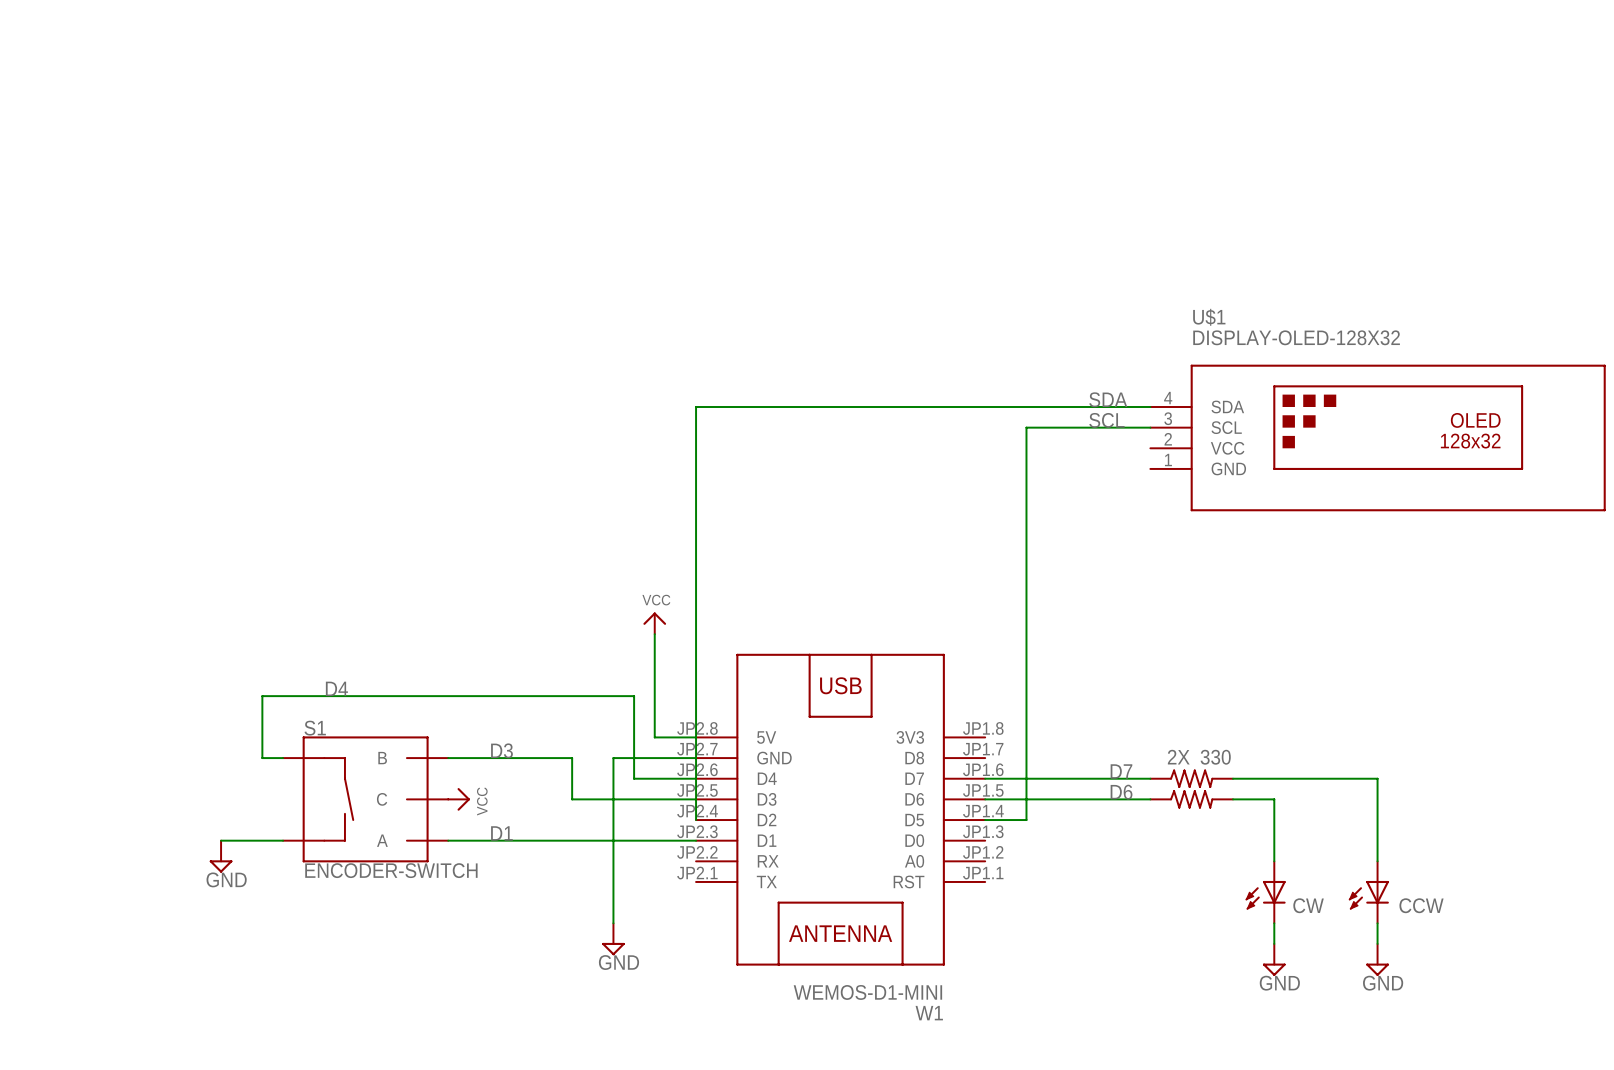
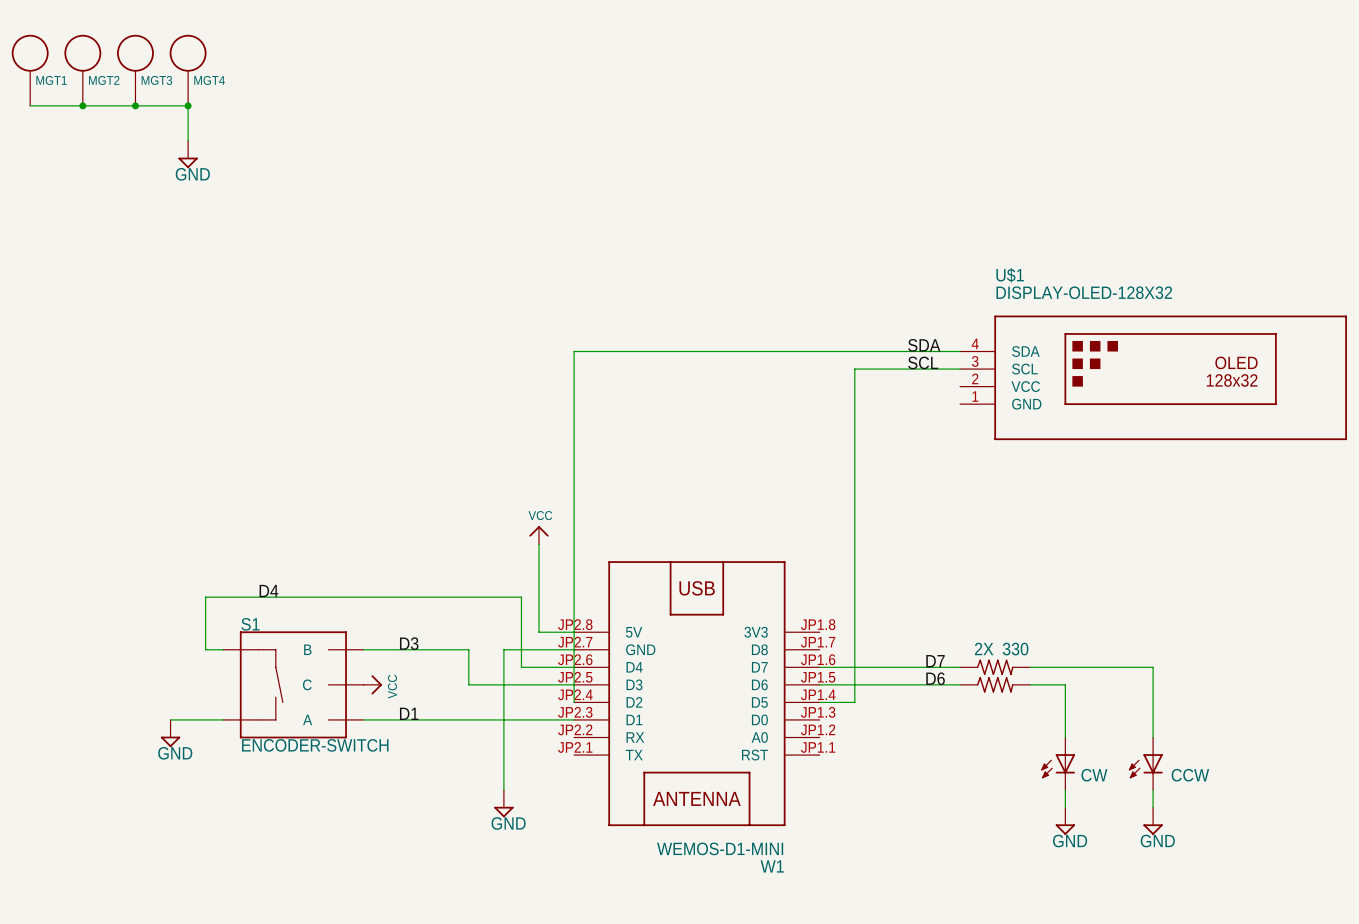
MGT1: none -> (30, 70)
MGT2: none -> (82, 70)
MGT3: none -> (135, 70)
MGT4: none -> (188, 70)
wire: none -> (30, 105) (188, 105) (188, 140)
junction: none -> (82, 105)
junction: none -> (135, 105)
junction: none -> (188, 105)
power symbol: none -> GND (188, 154)

